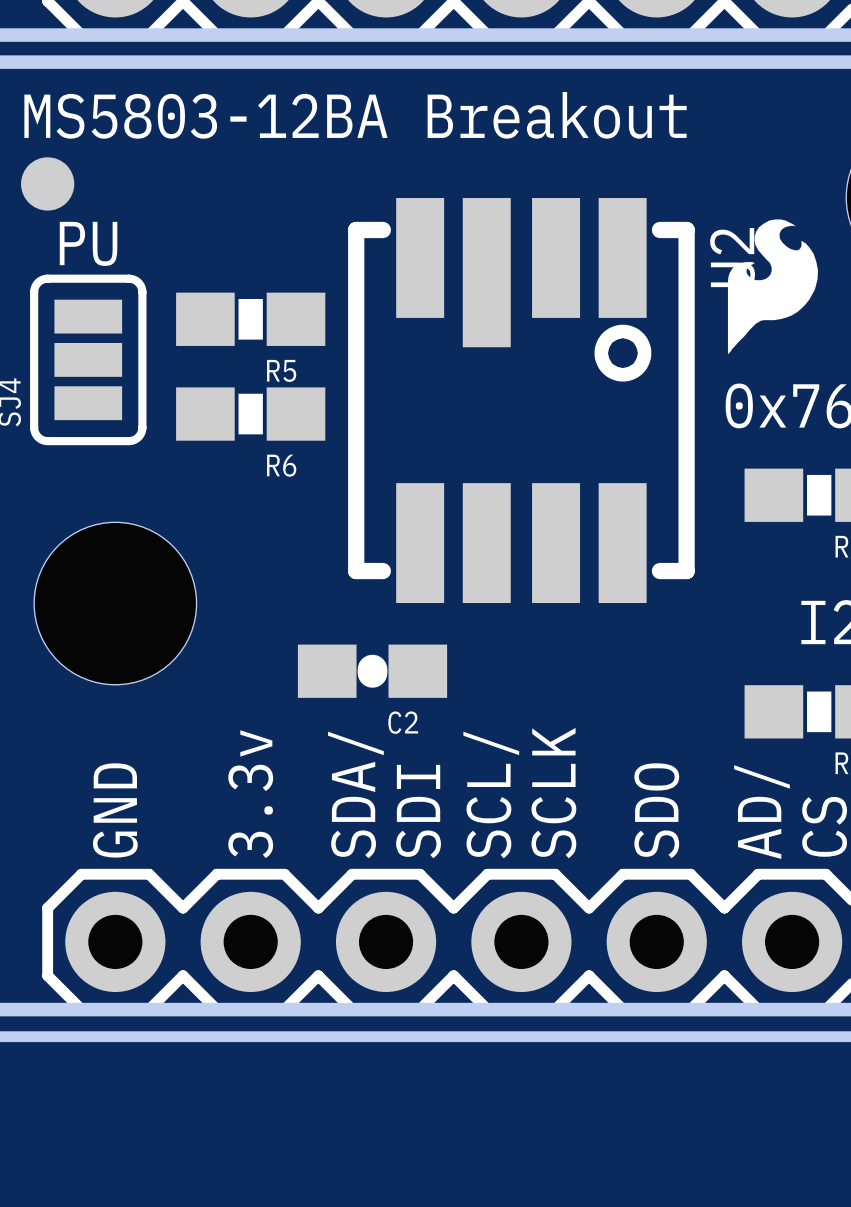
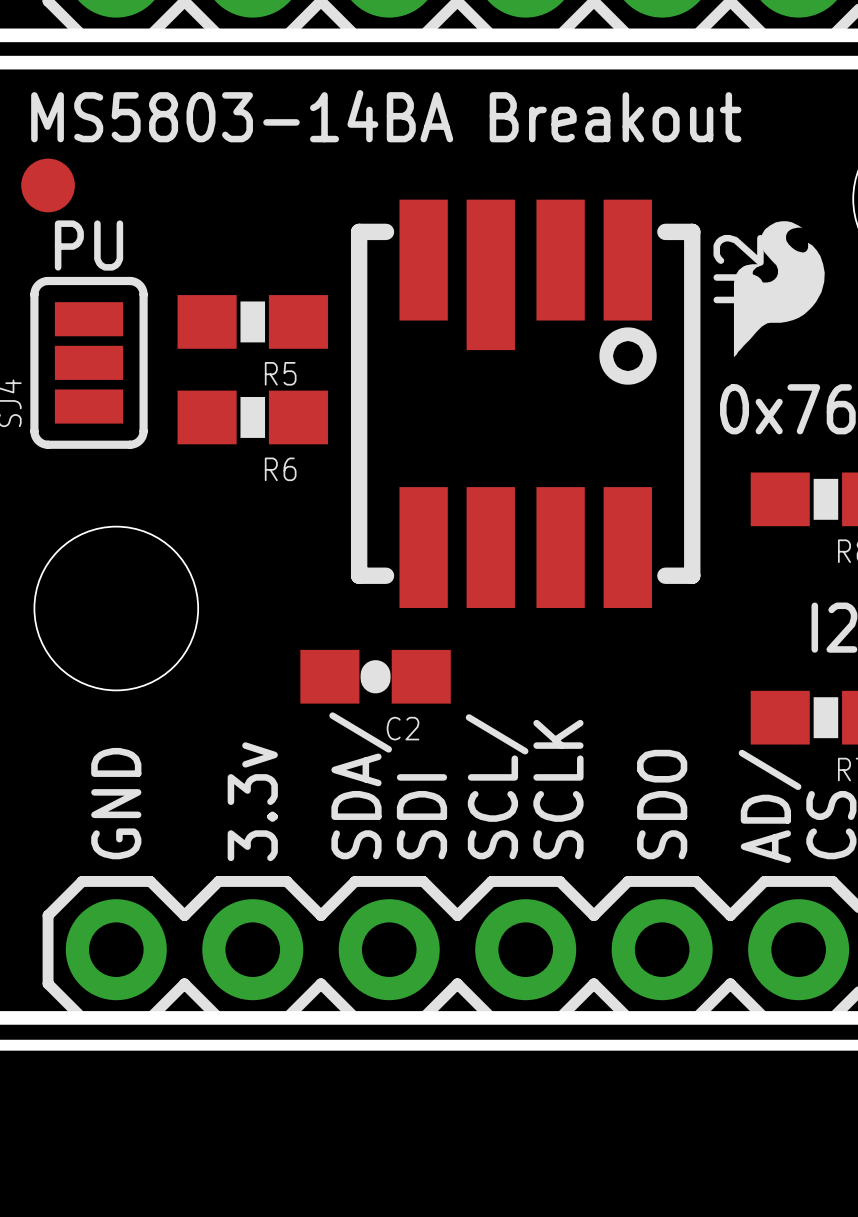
text: MS5803-12BA Breakout (355, 115) -> MS5803-14BA Breakout (386, 116)

